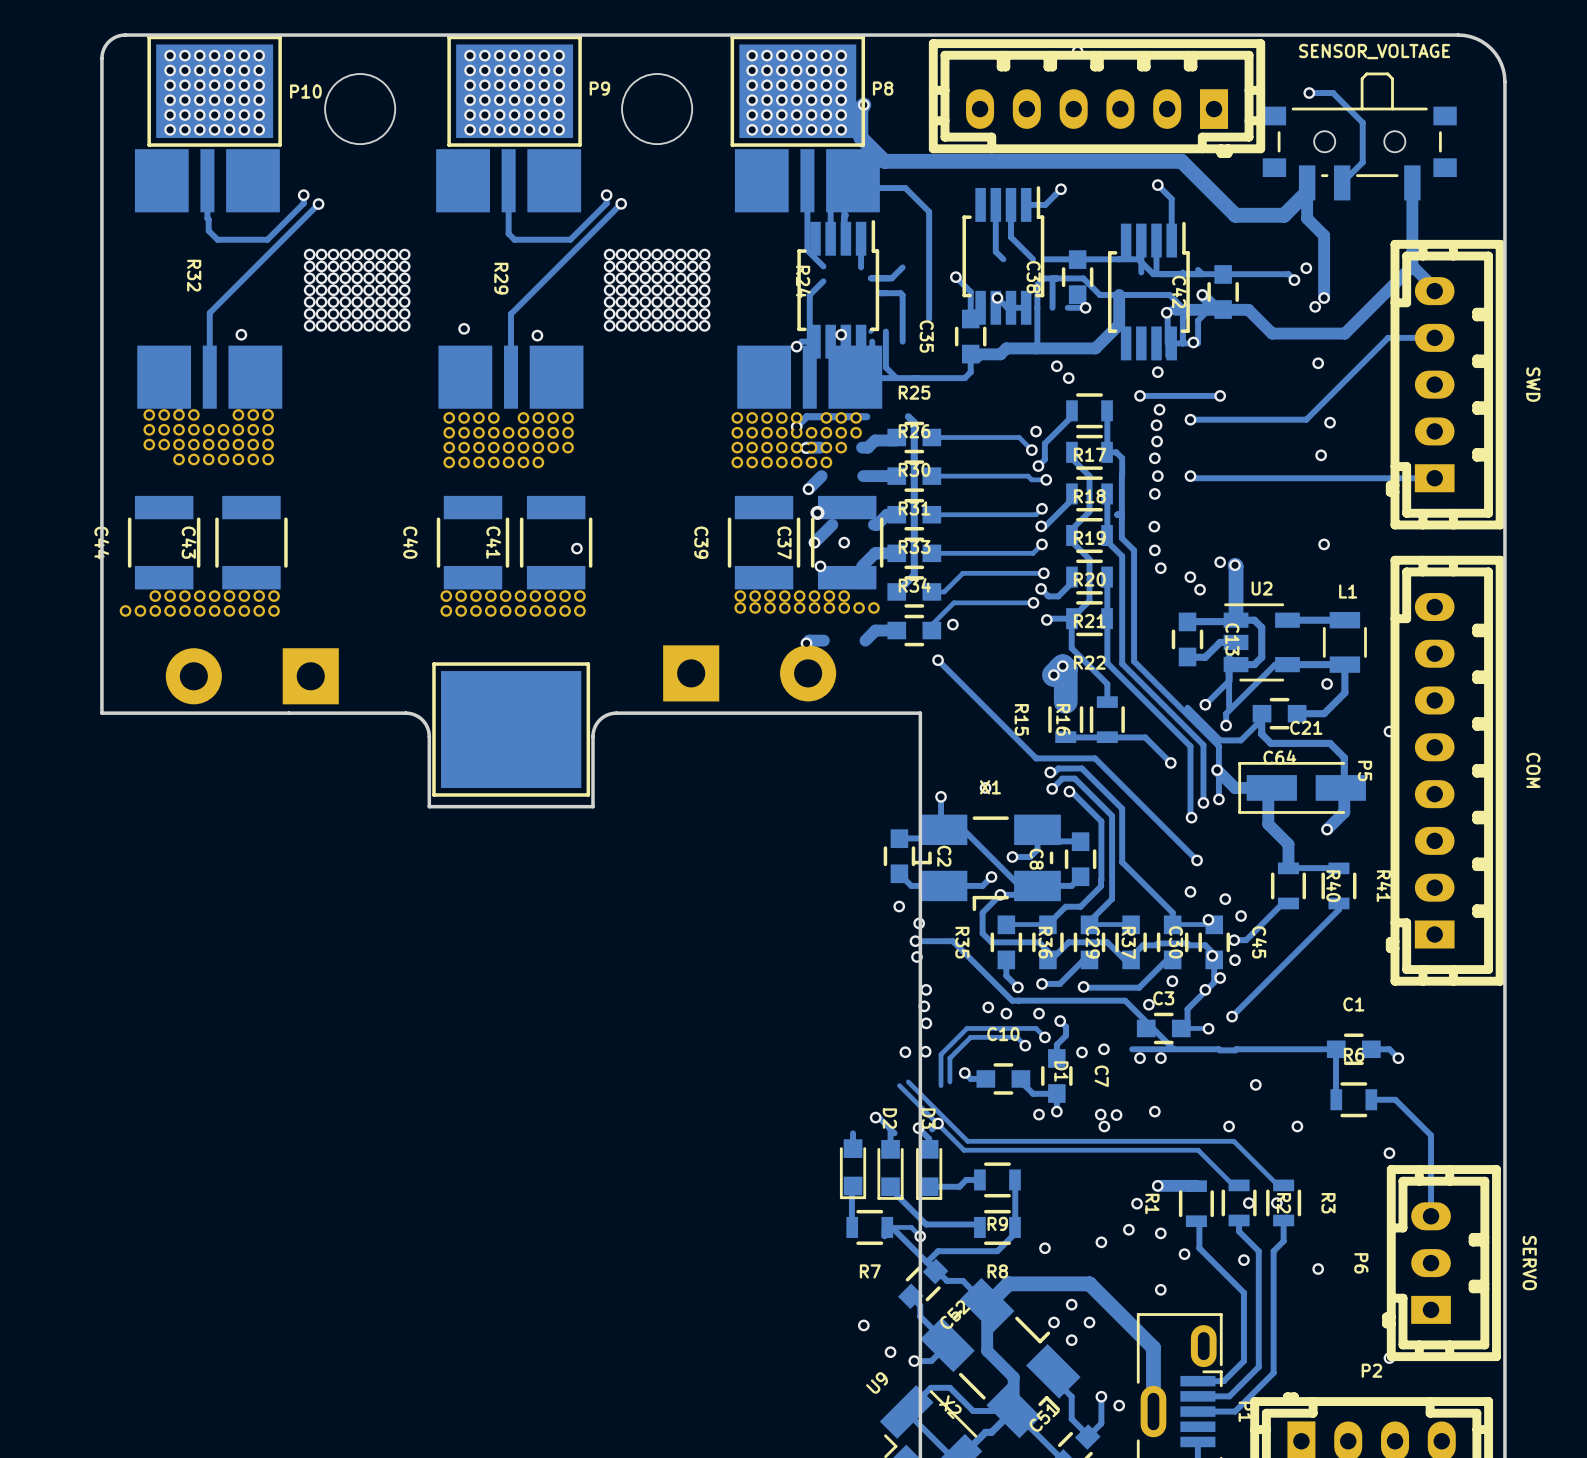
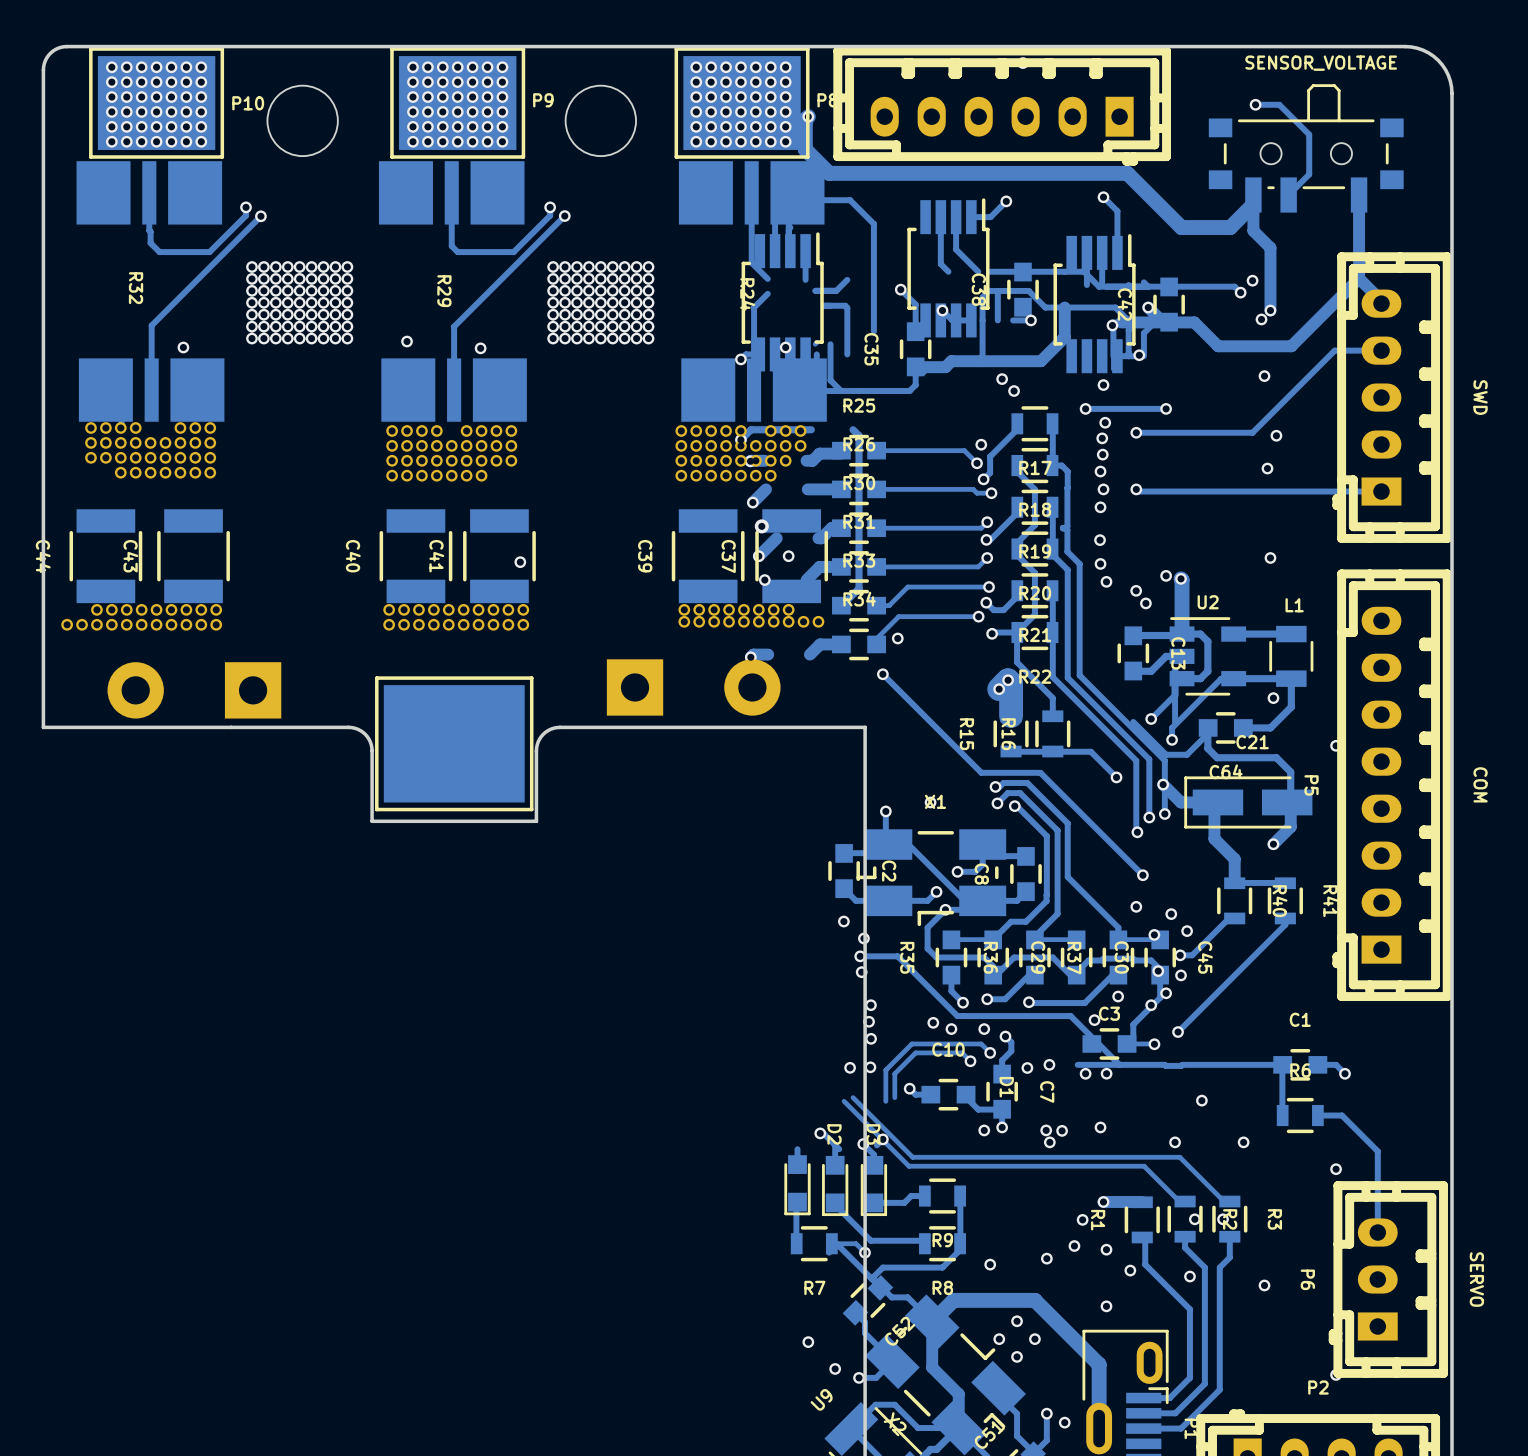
part position: (1097, 98) -> (1002, 106)

